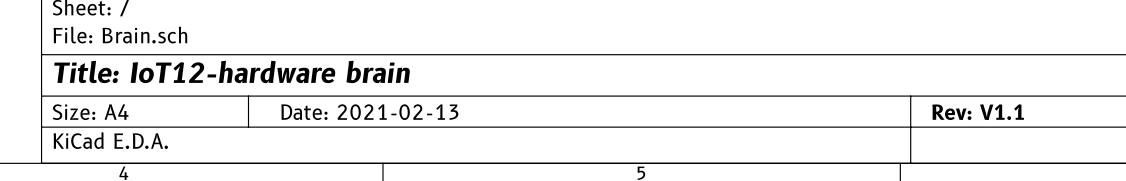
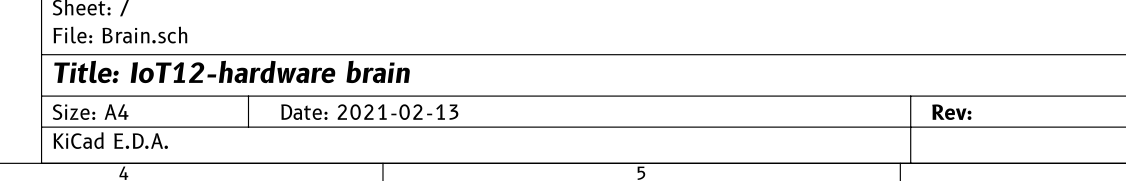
title block: Rev: V1.1 (978, 112) -> Rev: (951, 112)

